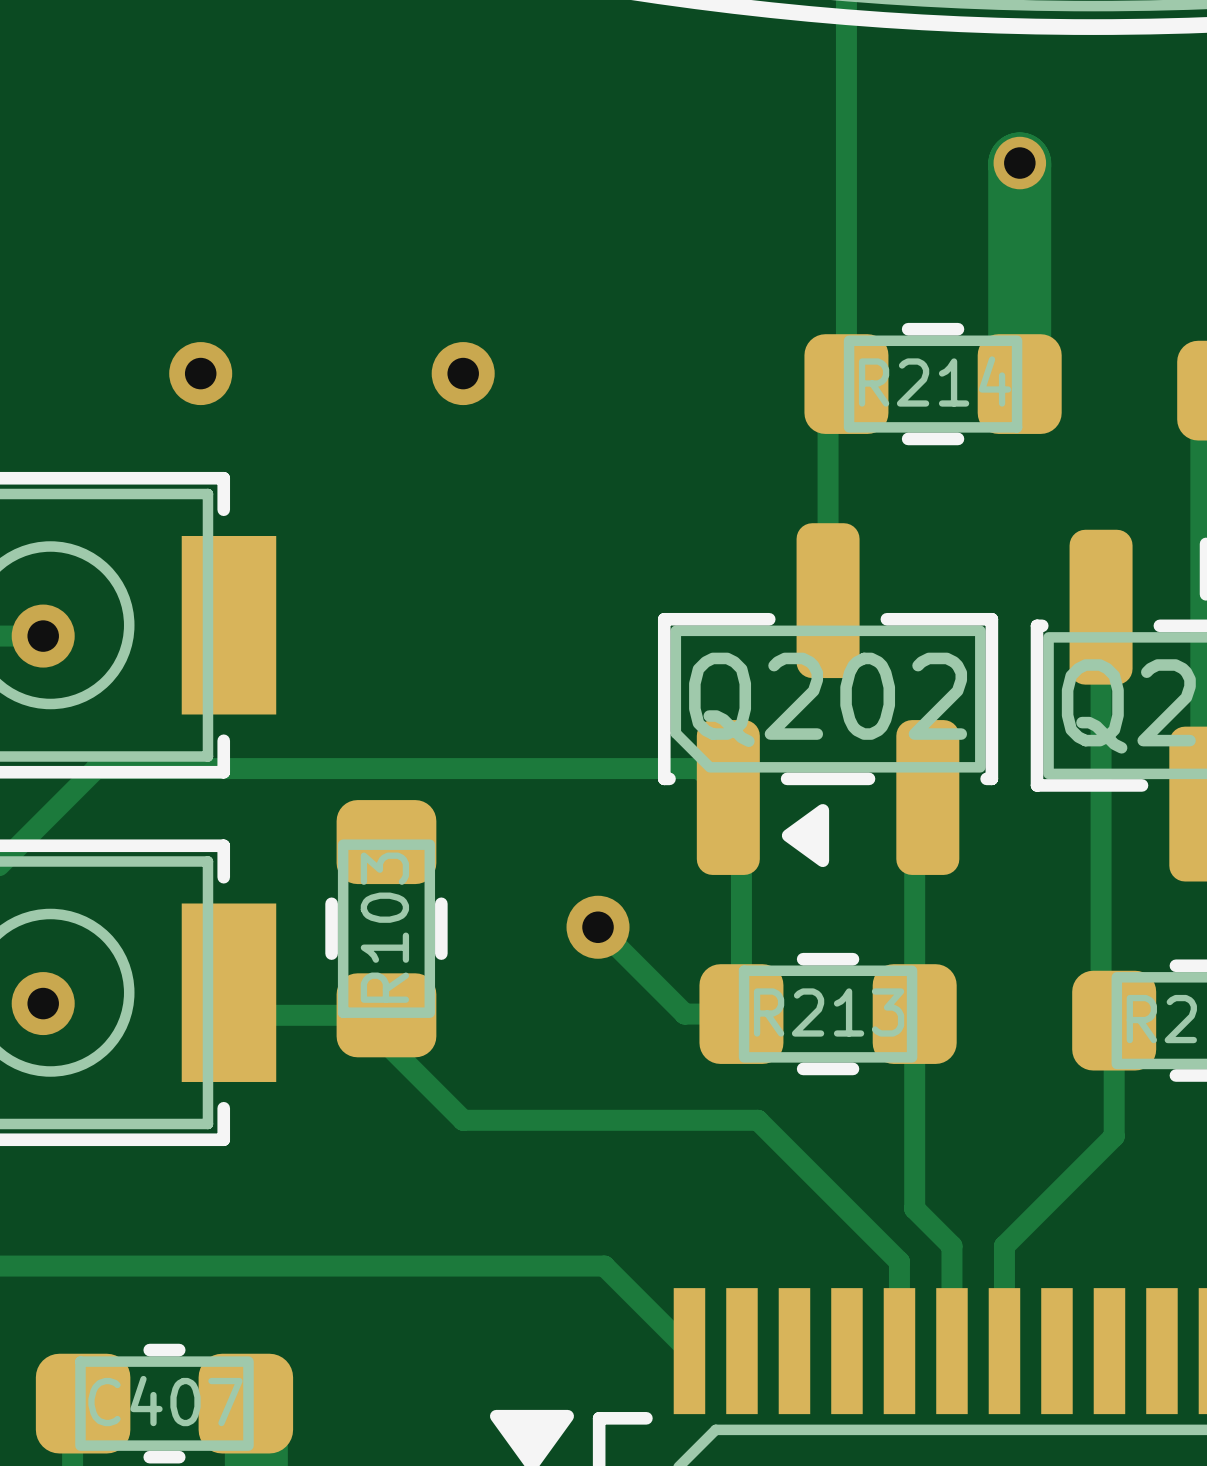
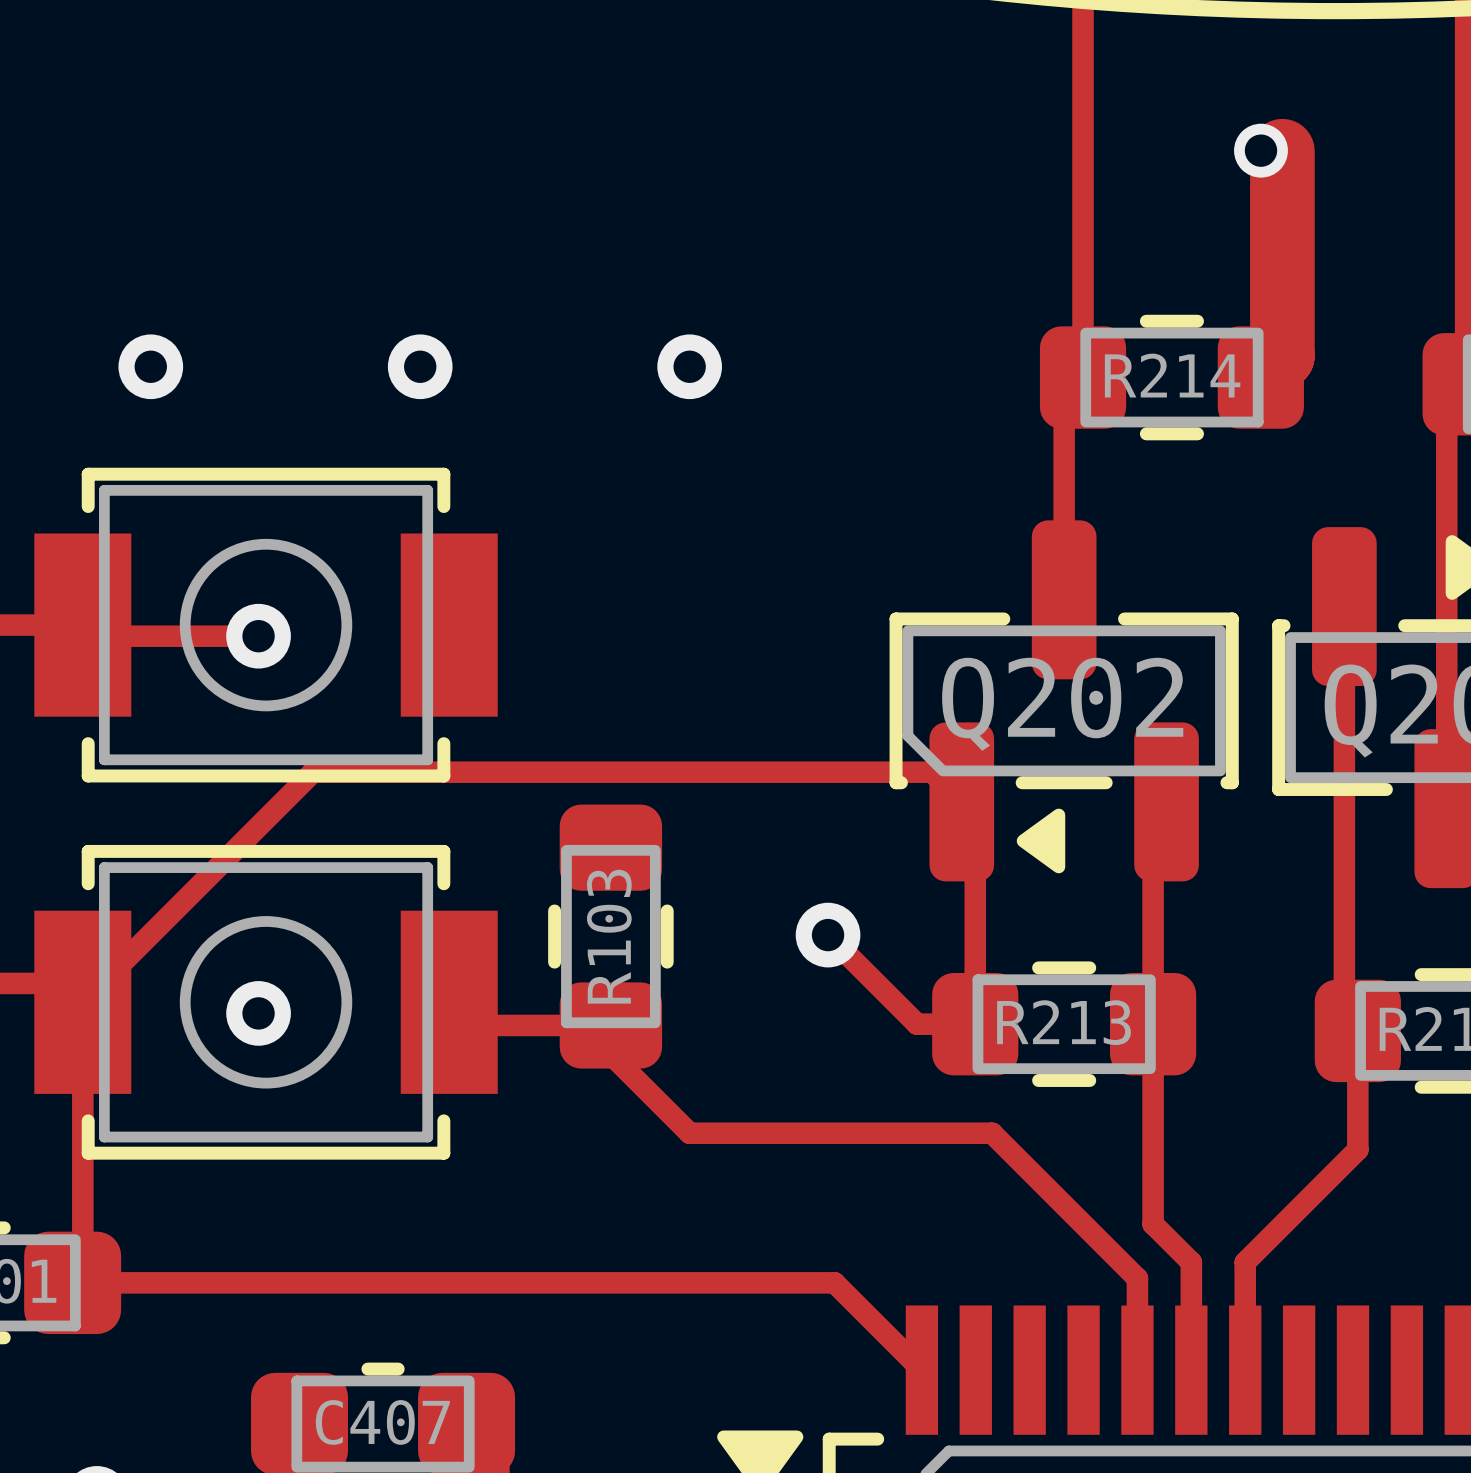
track: (1019, 163) (1019, 384) -> (1282, 151) (1282, 355) (1260, 377)

